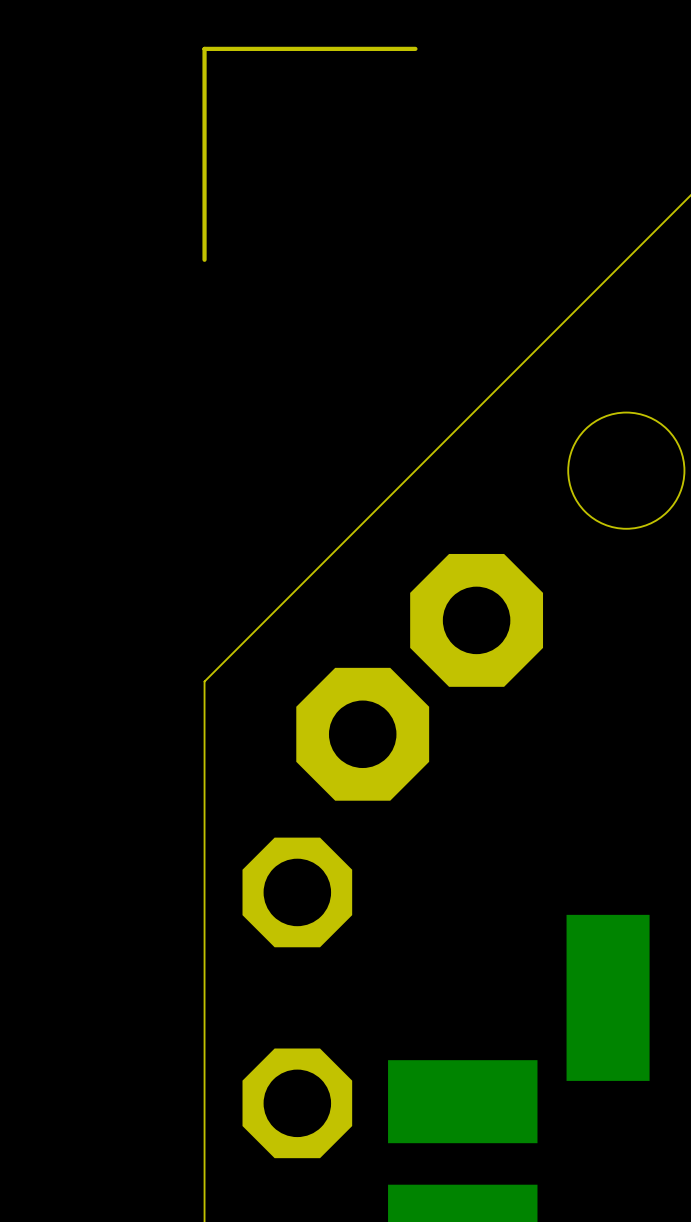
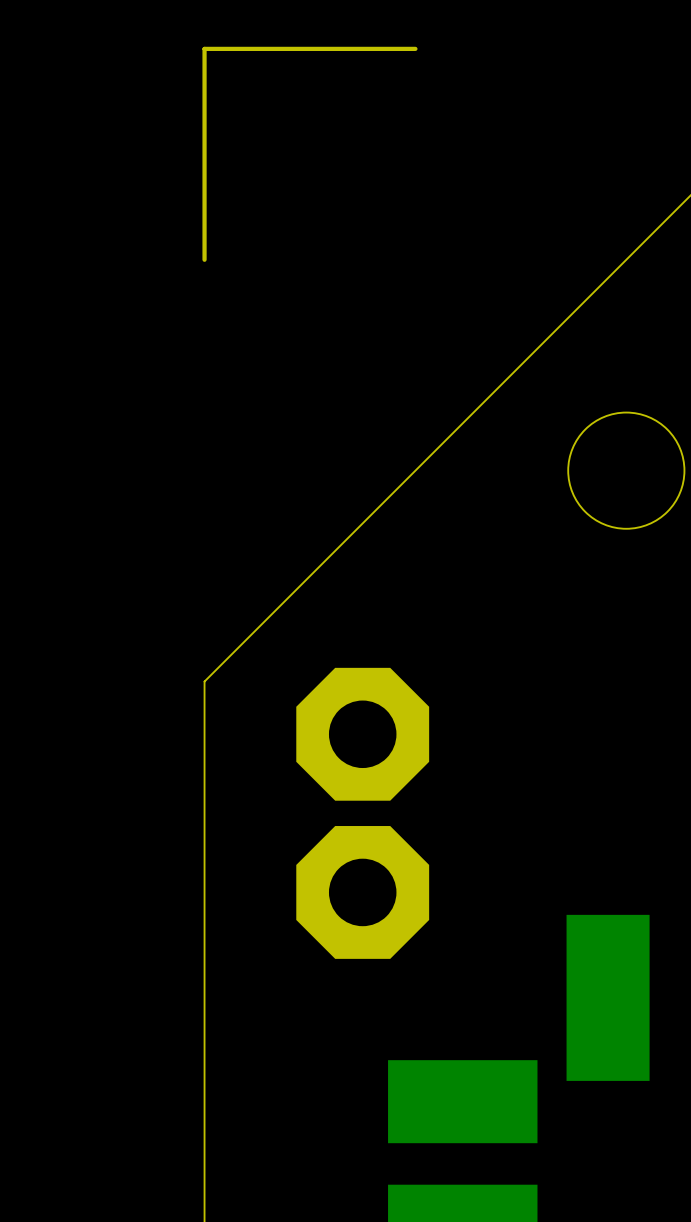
part position: (476, 620) -> (362, 892)
part: (297, 997) -> none

